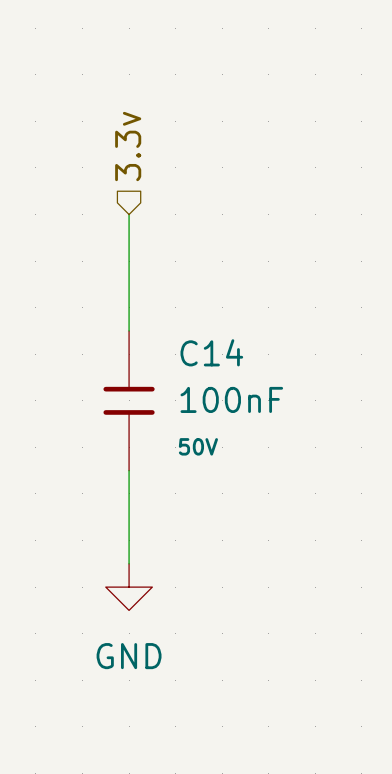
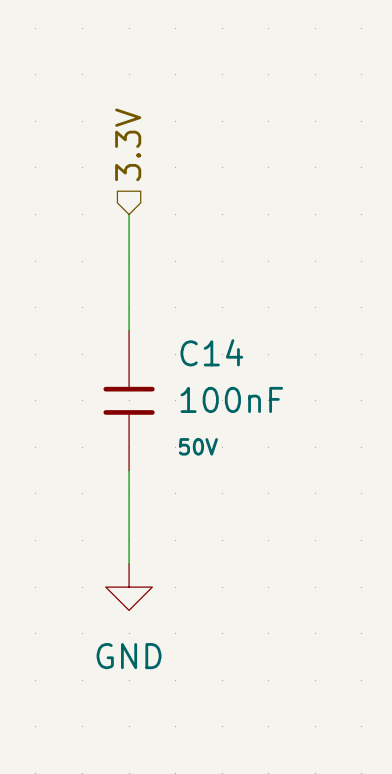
hierarchical label: 3.3v (128, 146) -> 3.3V (128, 144)

